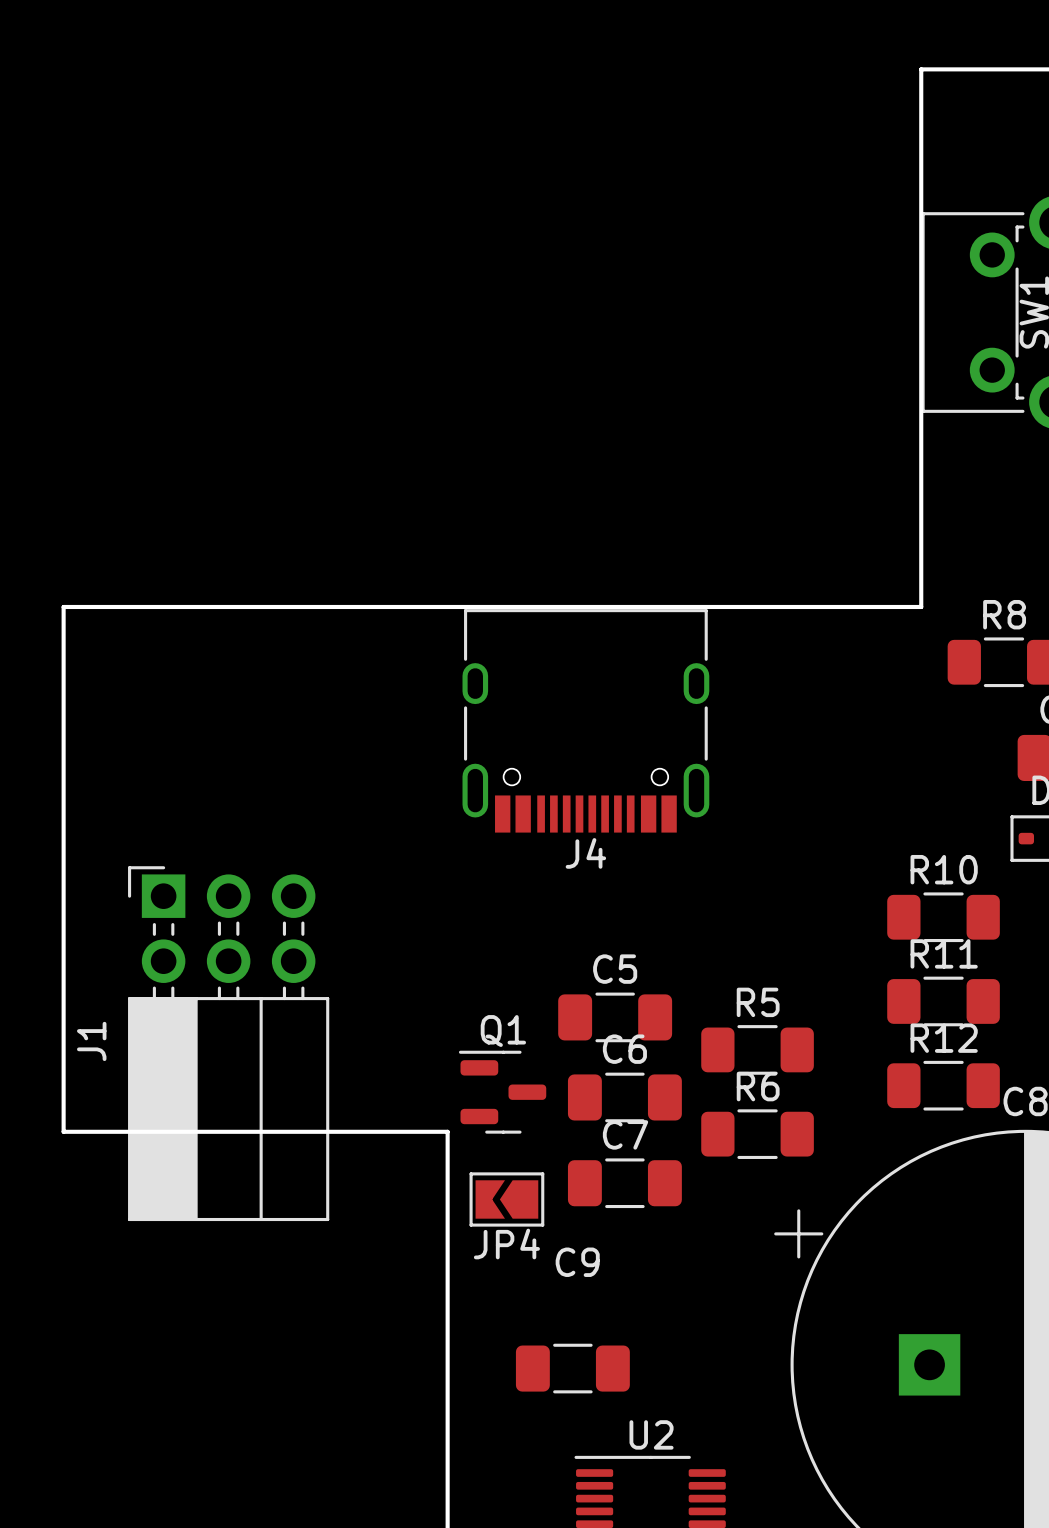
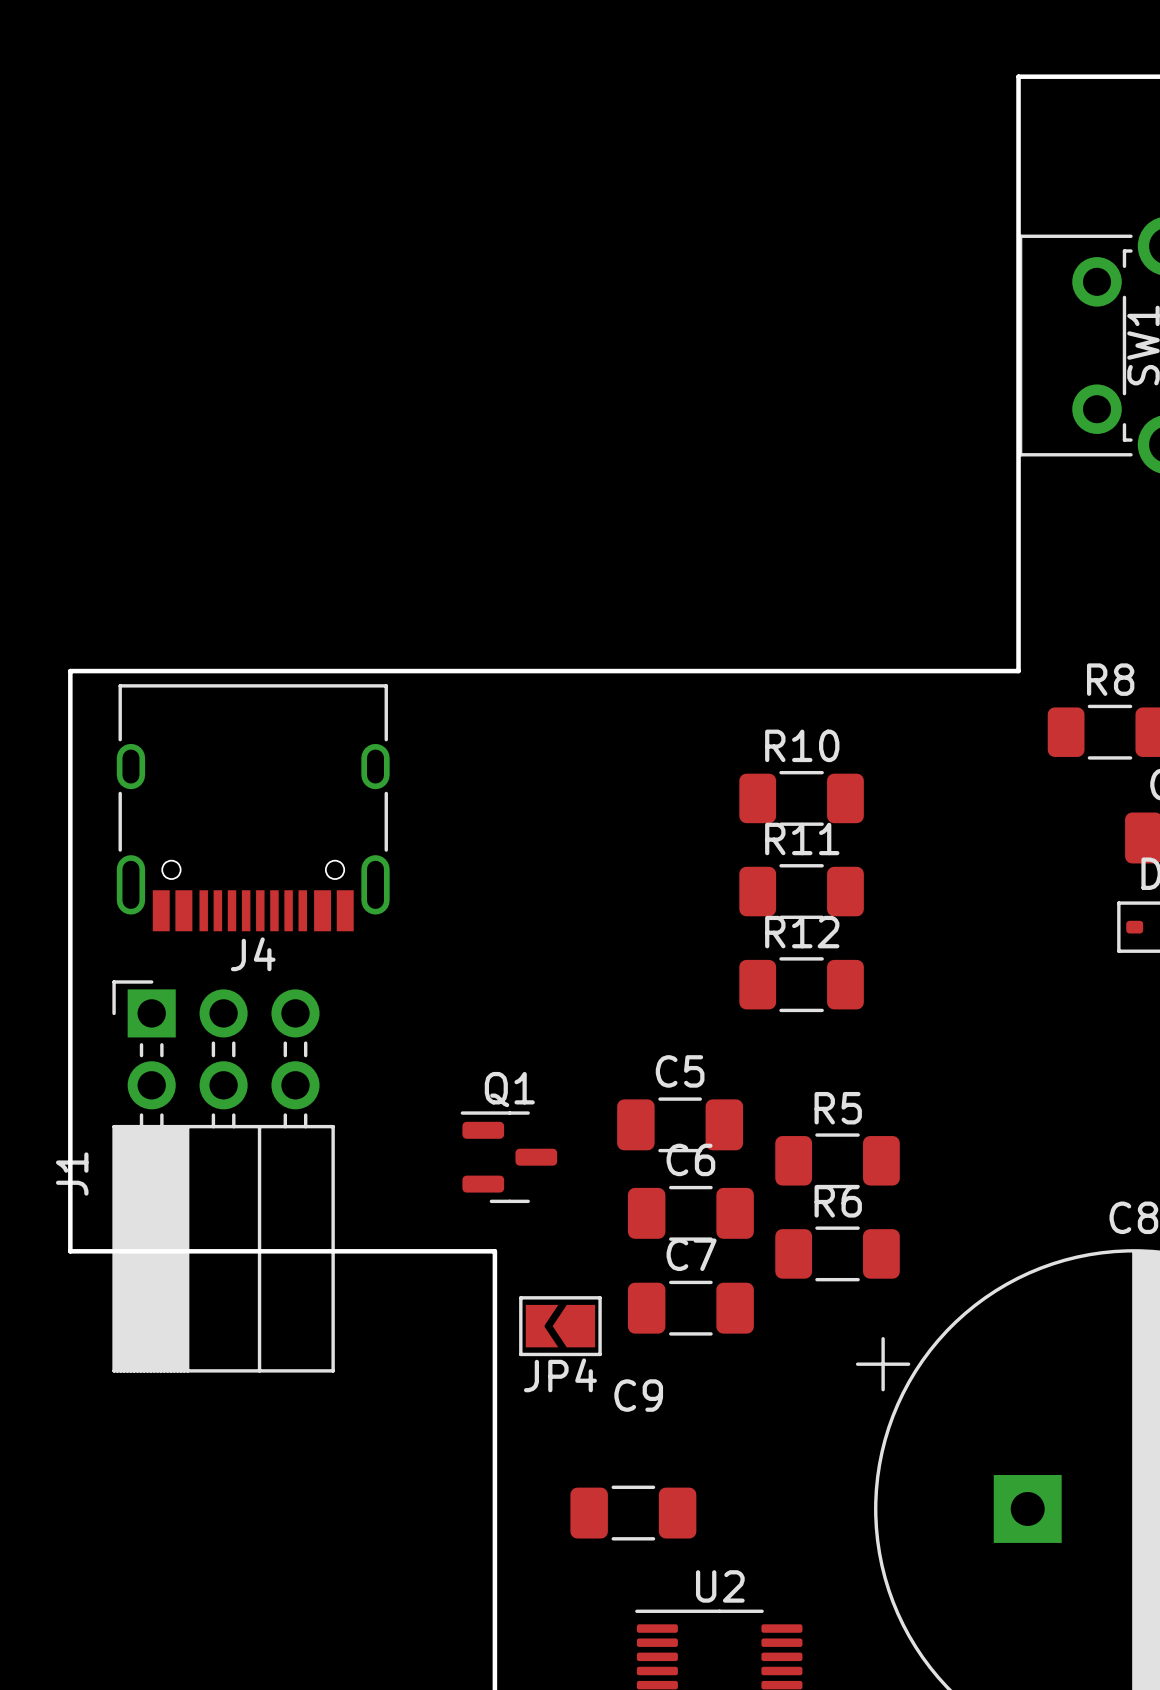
J4 position: (585, 720) -> (253, 807)
R10 position: (943, 917) -> (801, 798)
R11 position: (943, 1001) -> (801, 891)
J1 position: (228, 1043) -> (223, 1176)
R12 position: (943, 1085) -> (801, 984)
Q1 position: (502, 1092) -> (508, 1157)

